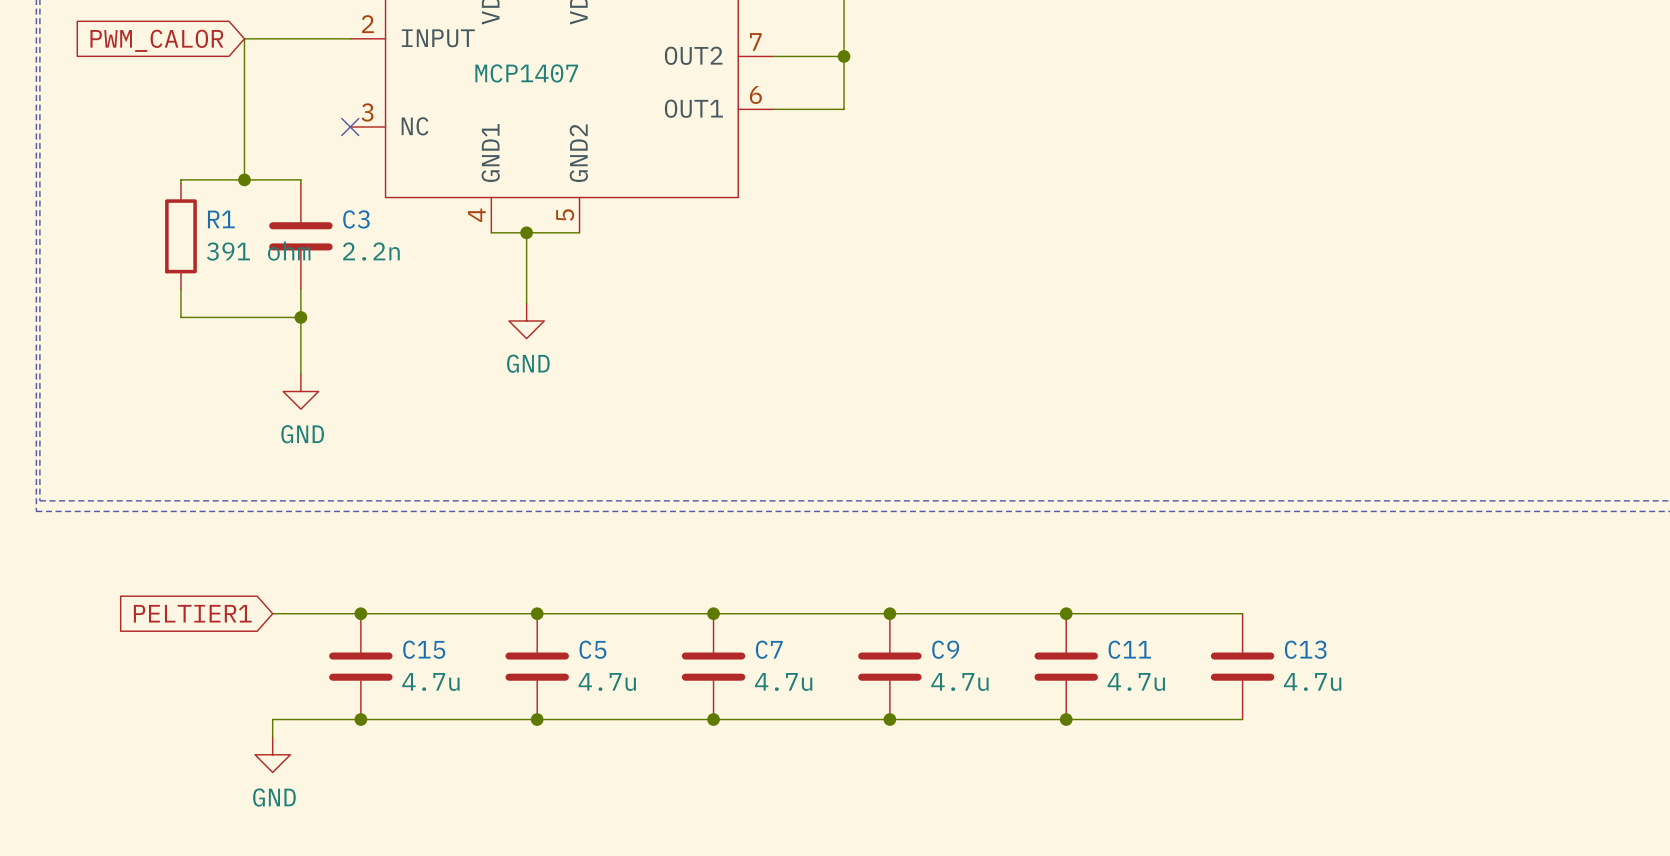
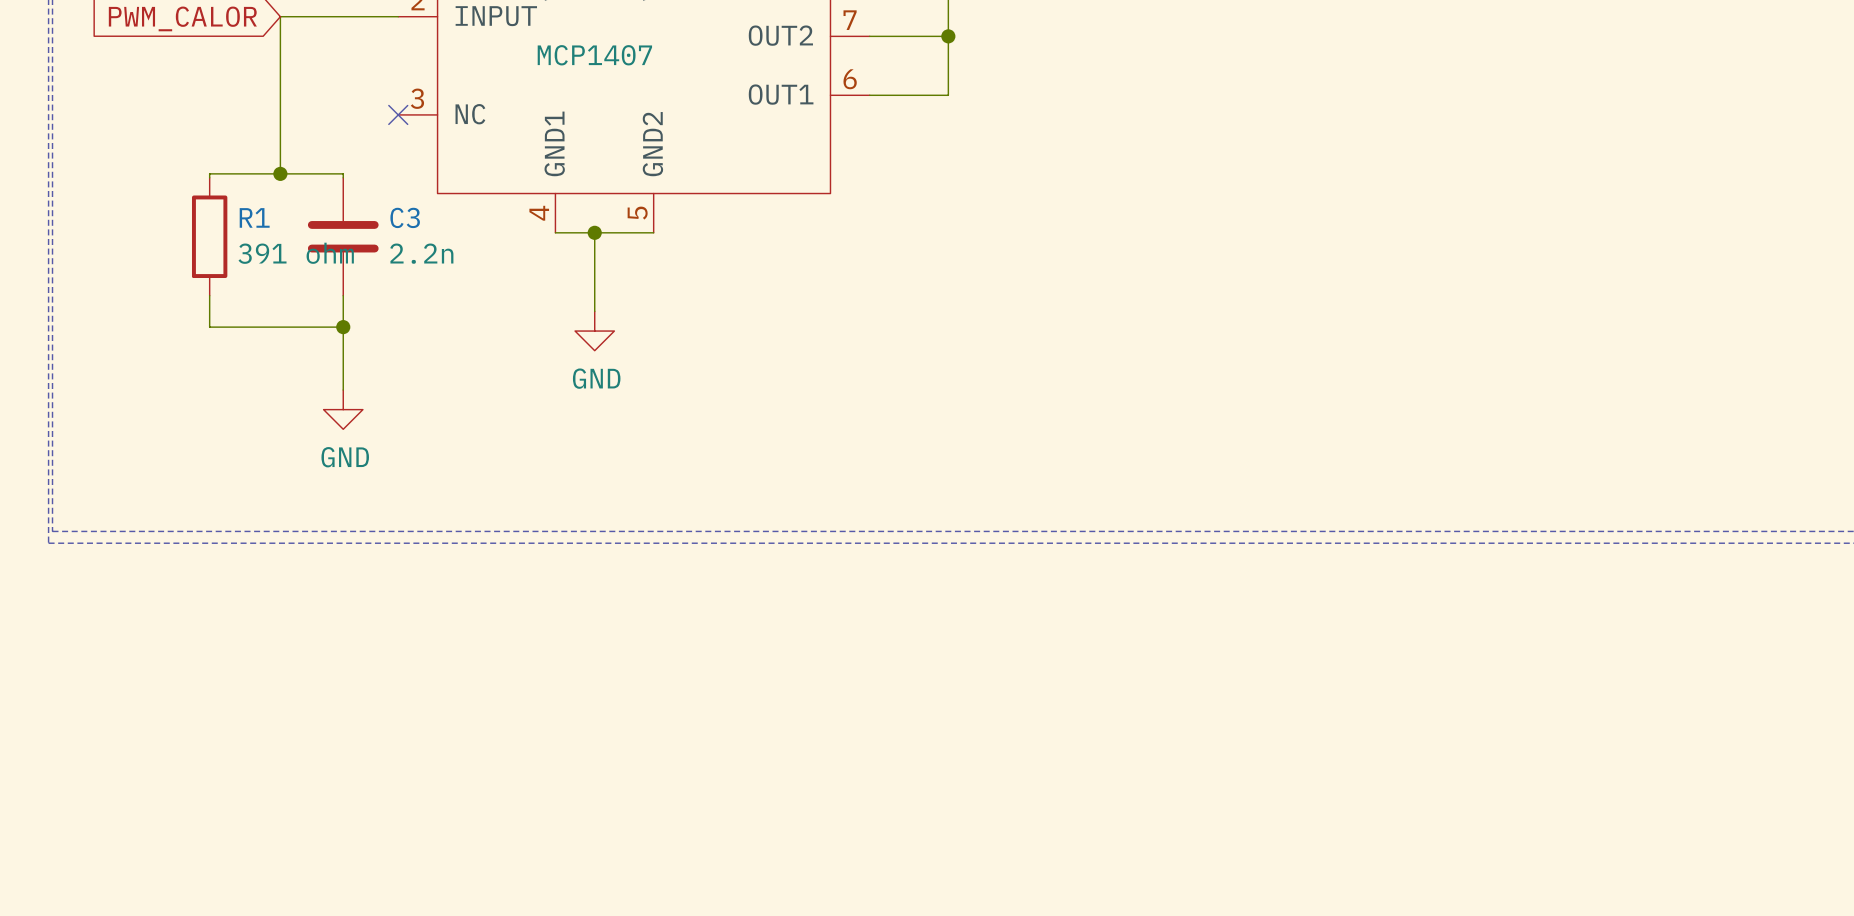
global label: PELTIER1 (192, 613) -> none
wire: (272, 613) (1242, 613) -> none
junction: (360, 613) -> none
junction: (537, 613) -> none
junction: (713, 613) -> none
junction: (889, 613) -> none
junction: (1066, 613) -> none
C15: 4.7u (360, 666) -> none
C5: 4.7u (537, 666) -> none
C7: 4.7u (713, 666) -> none
C9: 4.7u (889, 666) -> none
C11: 4.7u (1066, 666) -> none
C13: 4.7u (1242, 666) -> none
junction: (360, 719) -> none
junction: (537, 719) -> none
junction: (713, 719) -> none
junction: (889, 719) -> none
junction: (1066, 719) -> none
wire: (1242, 719) (272, 719) (272, 737) -> none
power symbol: GND (272, 754) -> none

